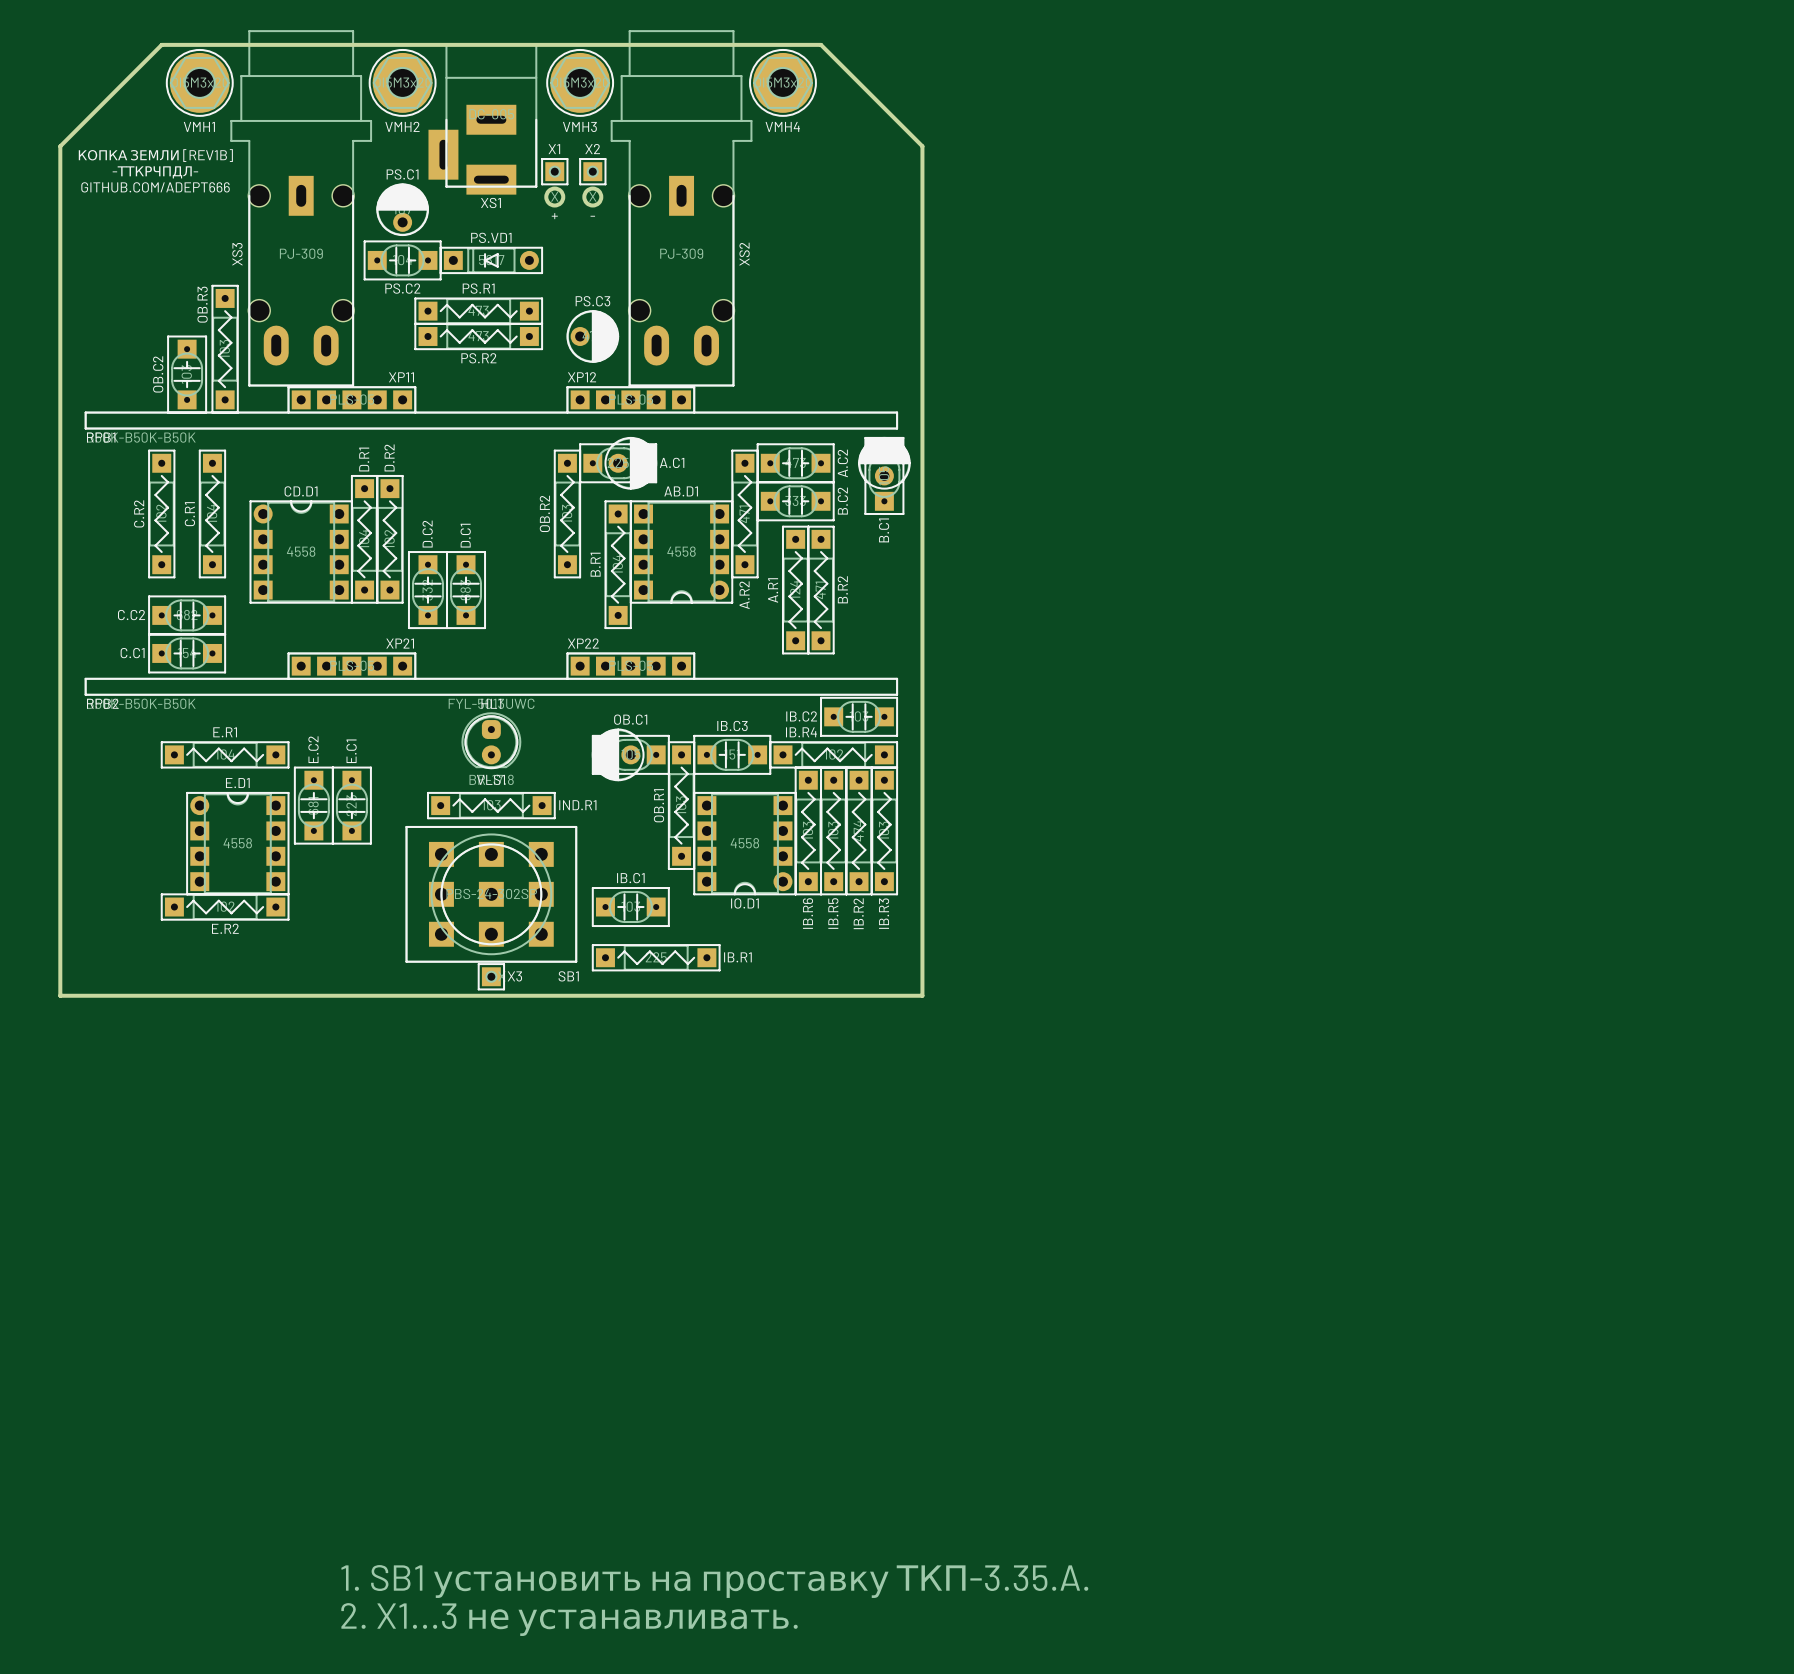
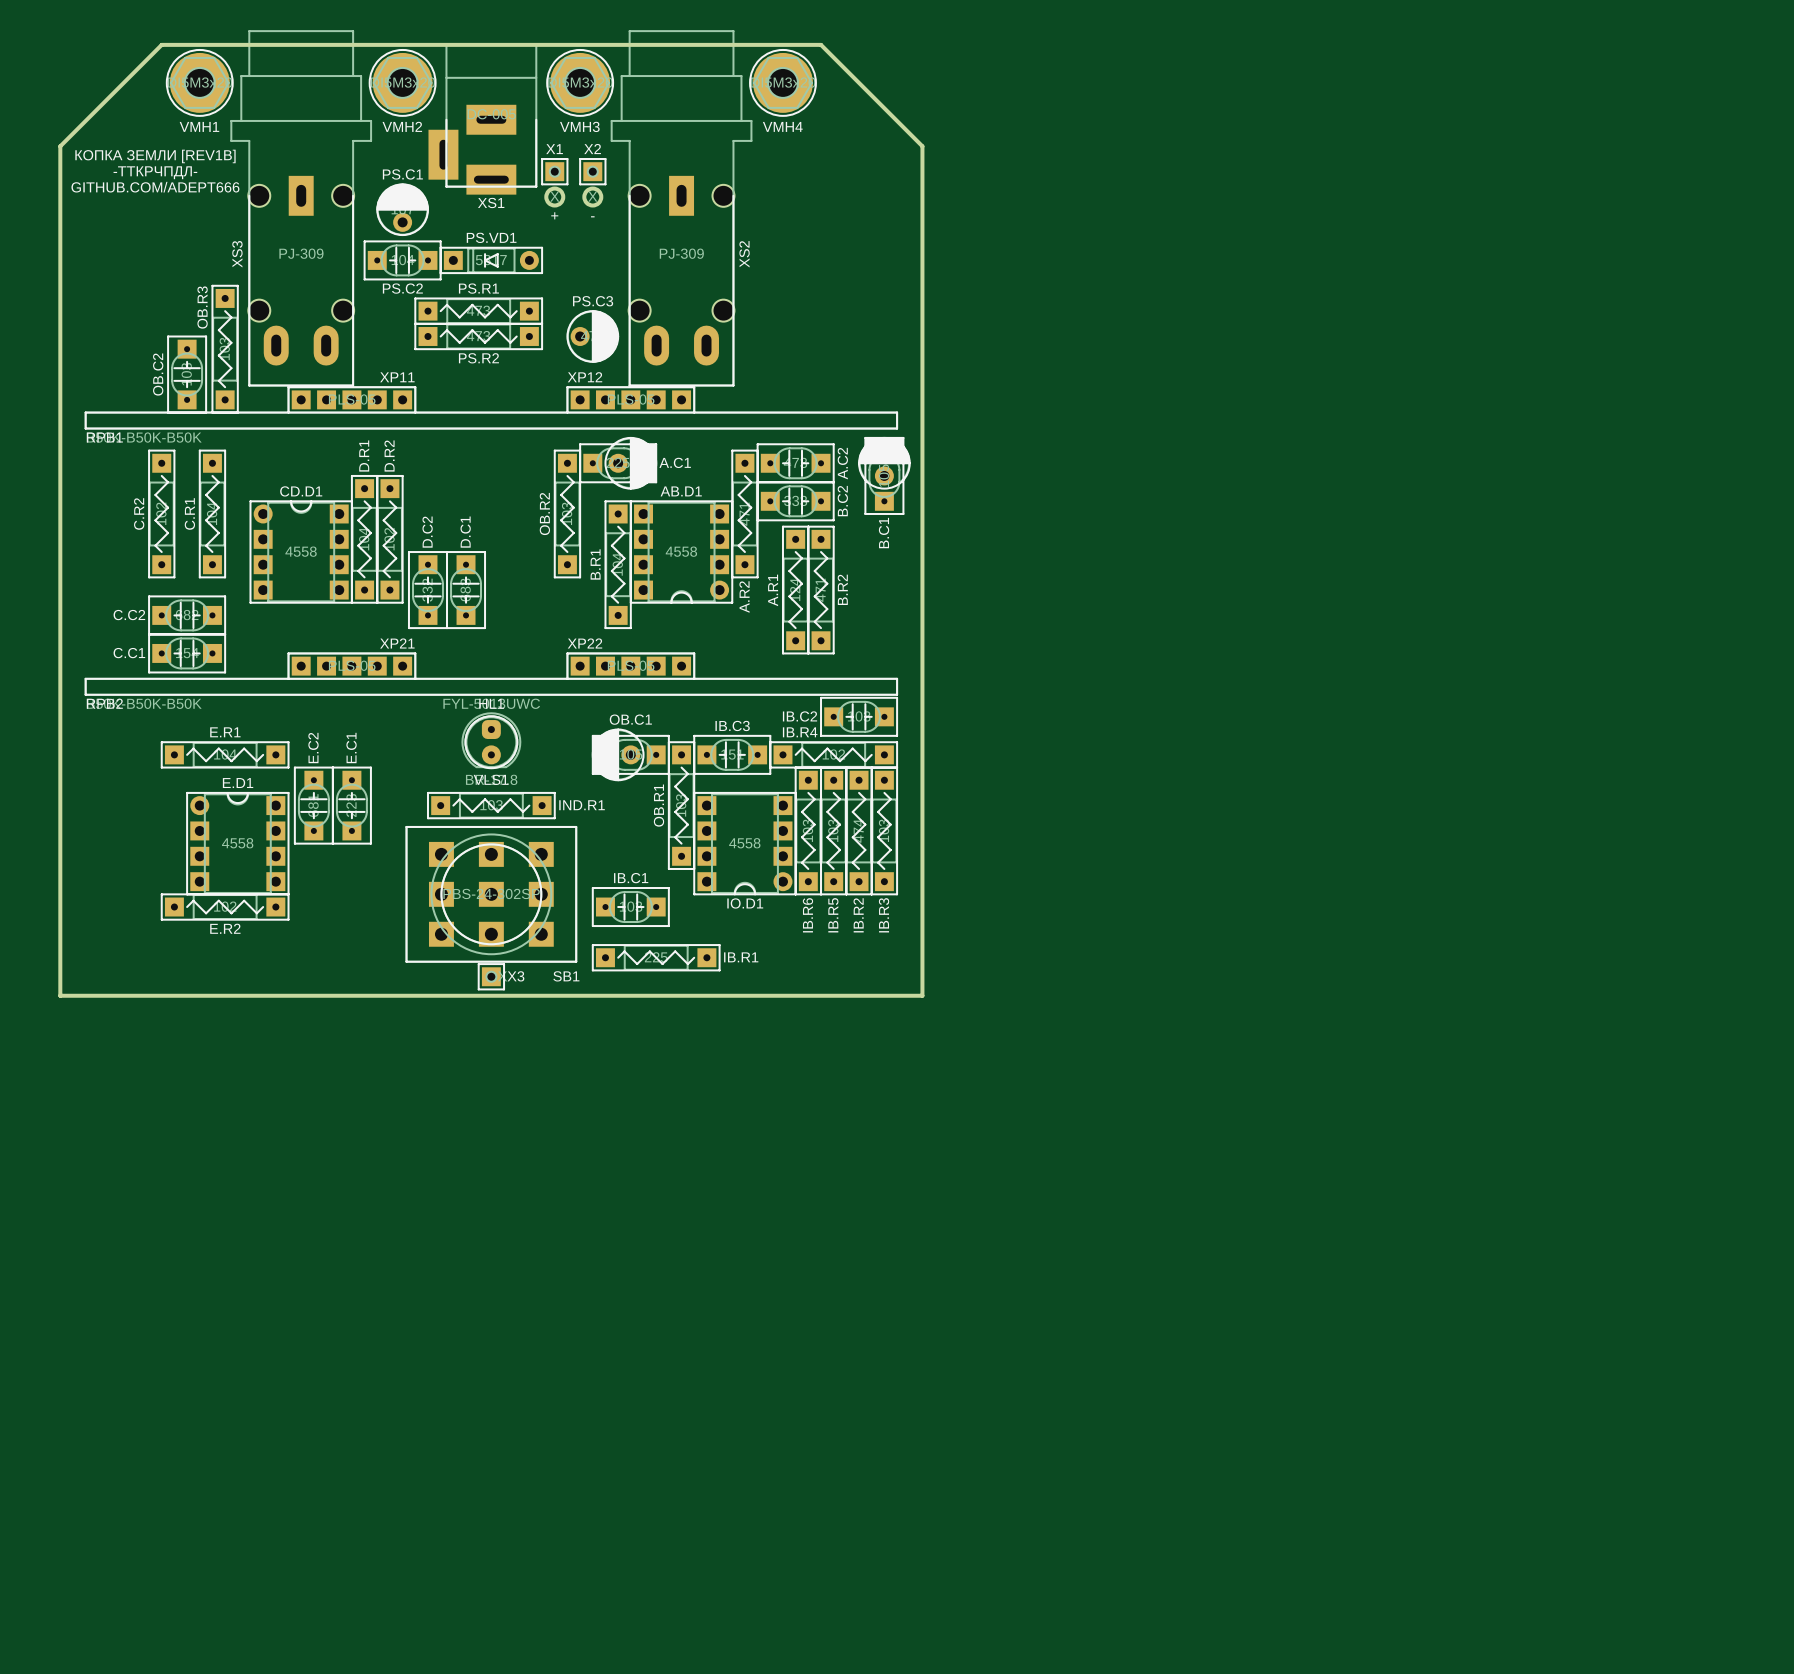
text: 1. SB1 установить на проставку ТКП-3.35.A. (714, 1581) -> none
text: 2. X1...3 не устанавливать. (569, 1619) -> none

